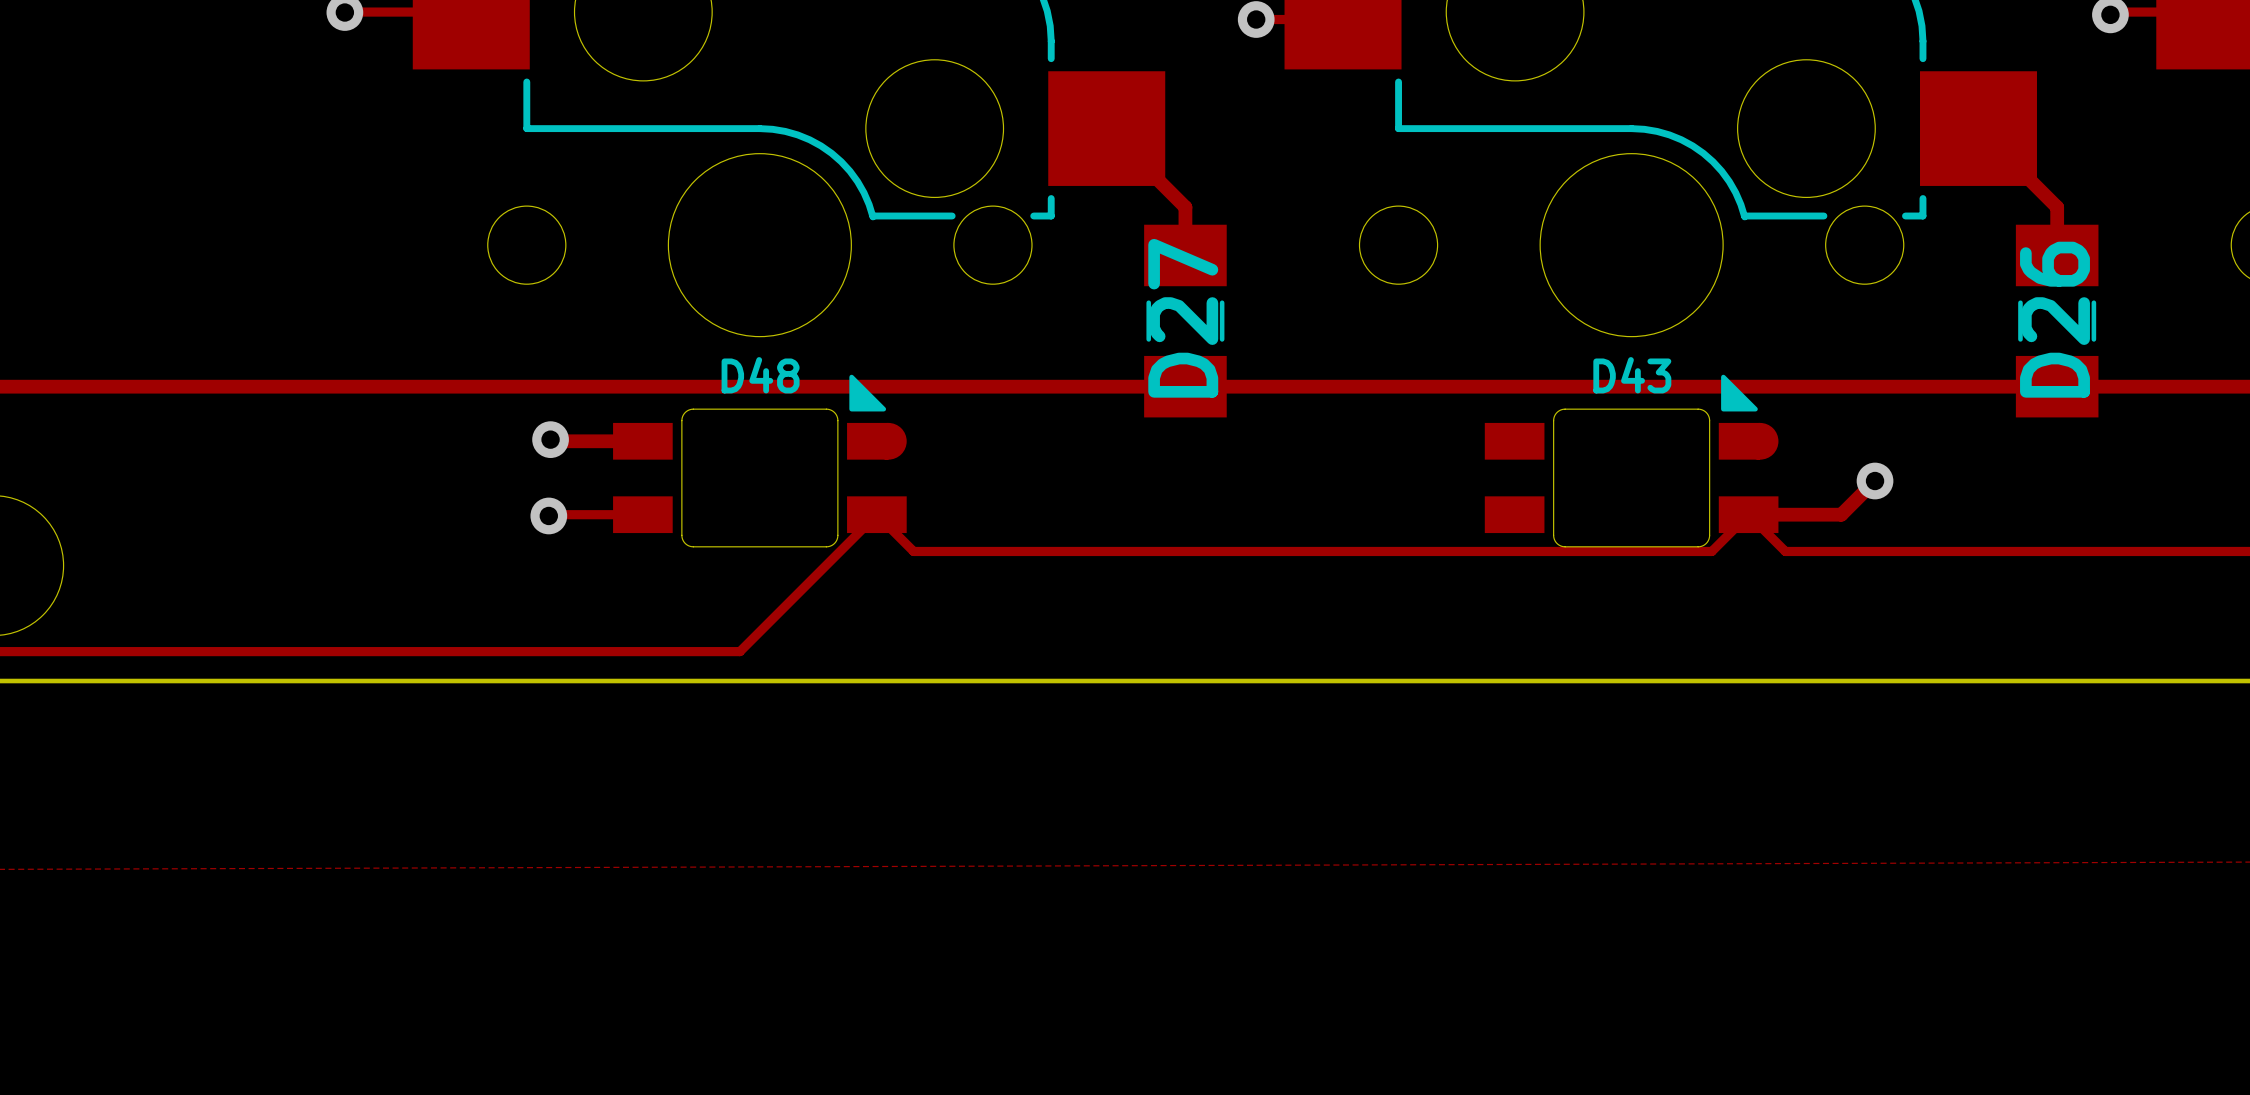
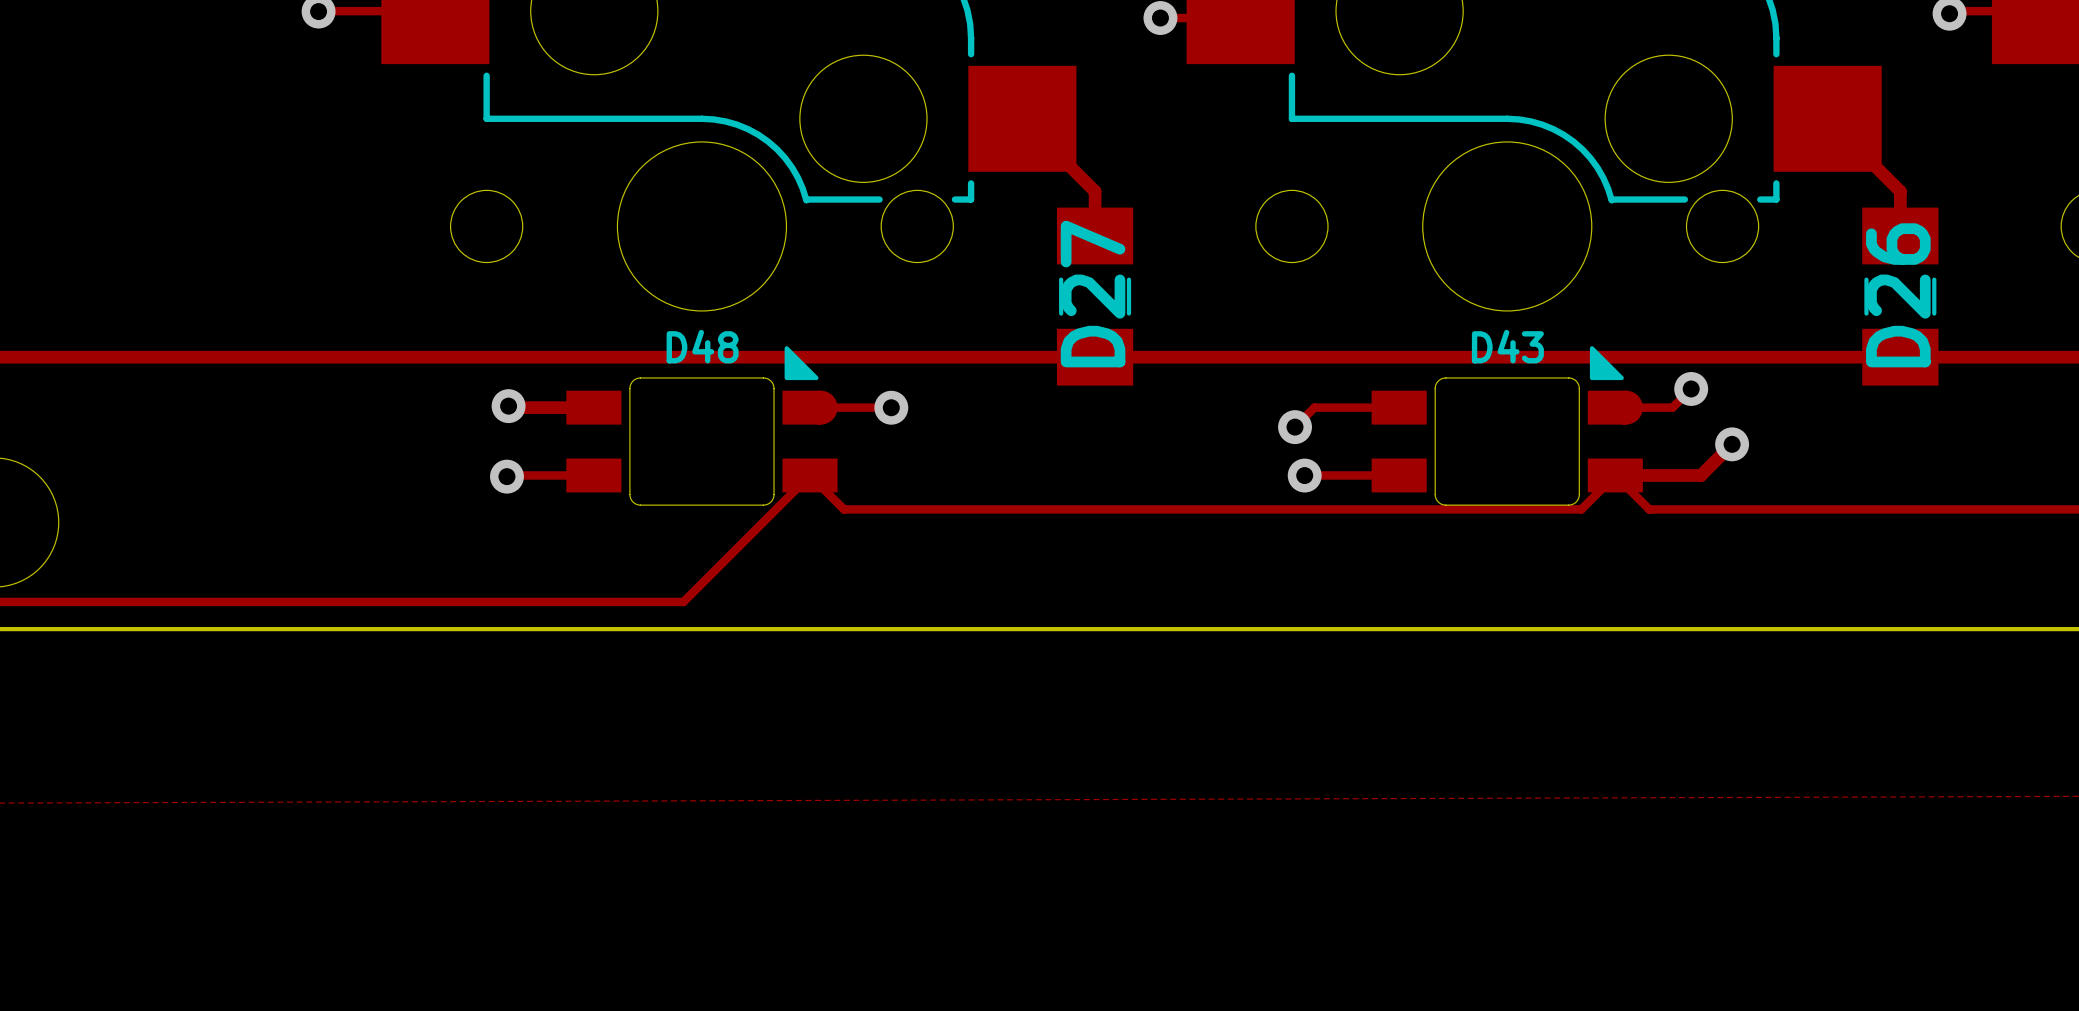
track: none -> (1691, 388) (1672, 407) (1625, 407)
via: none -> (1691, 388)
track: none -> (820, 407) (891, 407)
via: none -> (891, 407)
track: none -> (1399, 407) (1314, 407) (1295, 427)
via: none -> (1295, 427)
track: none -> (1304, 475) (1399, 475)
via: none -> (1304, 475)

